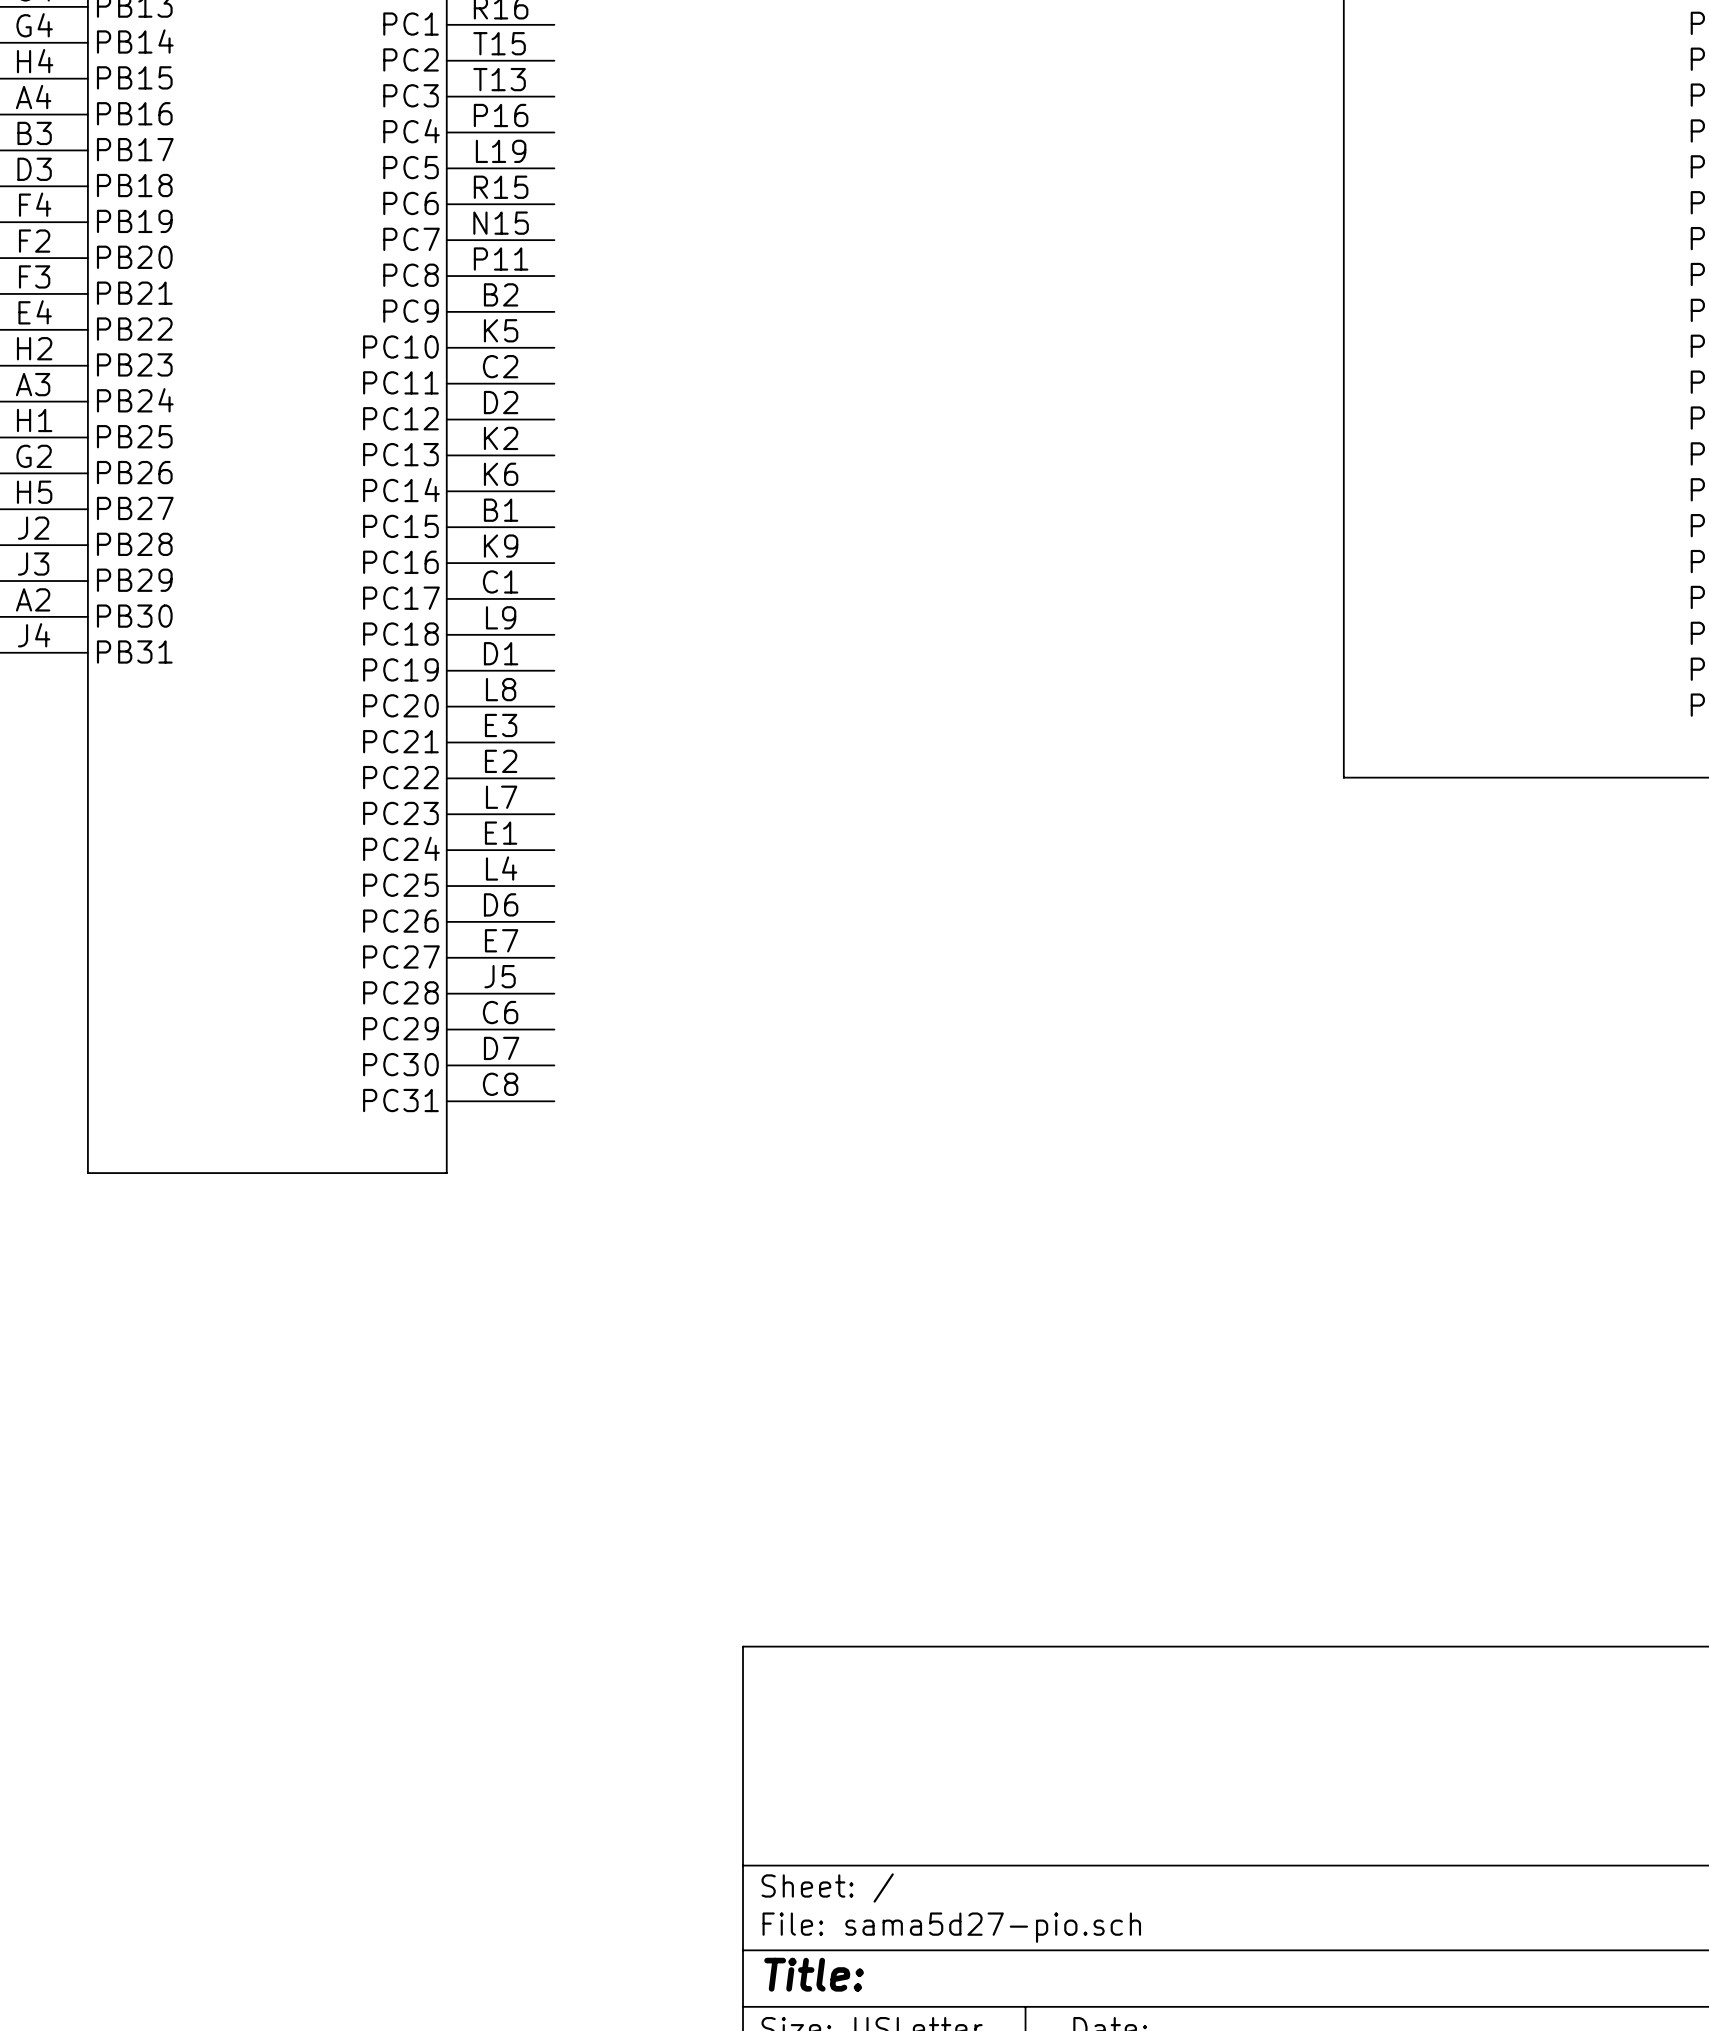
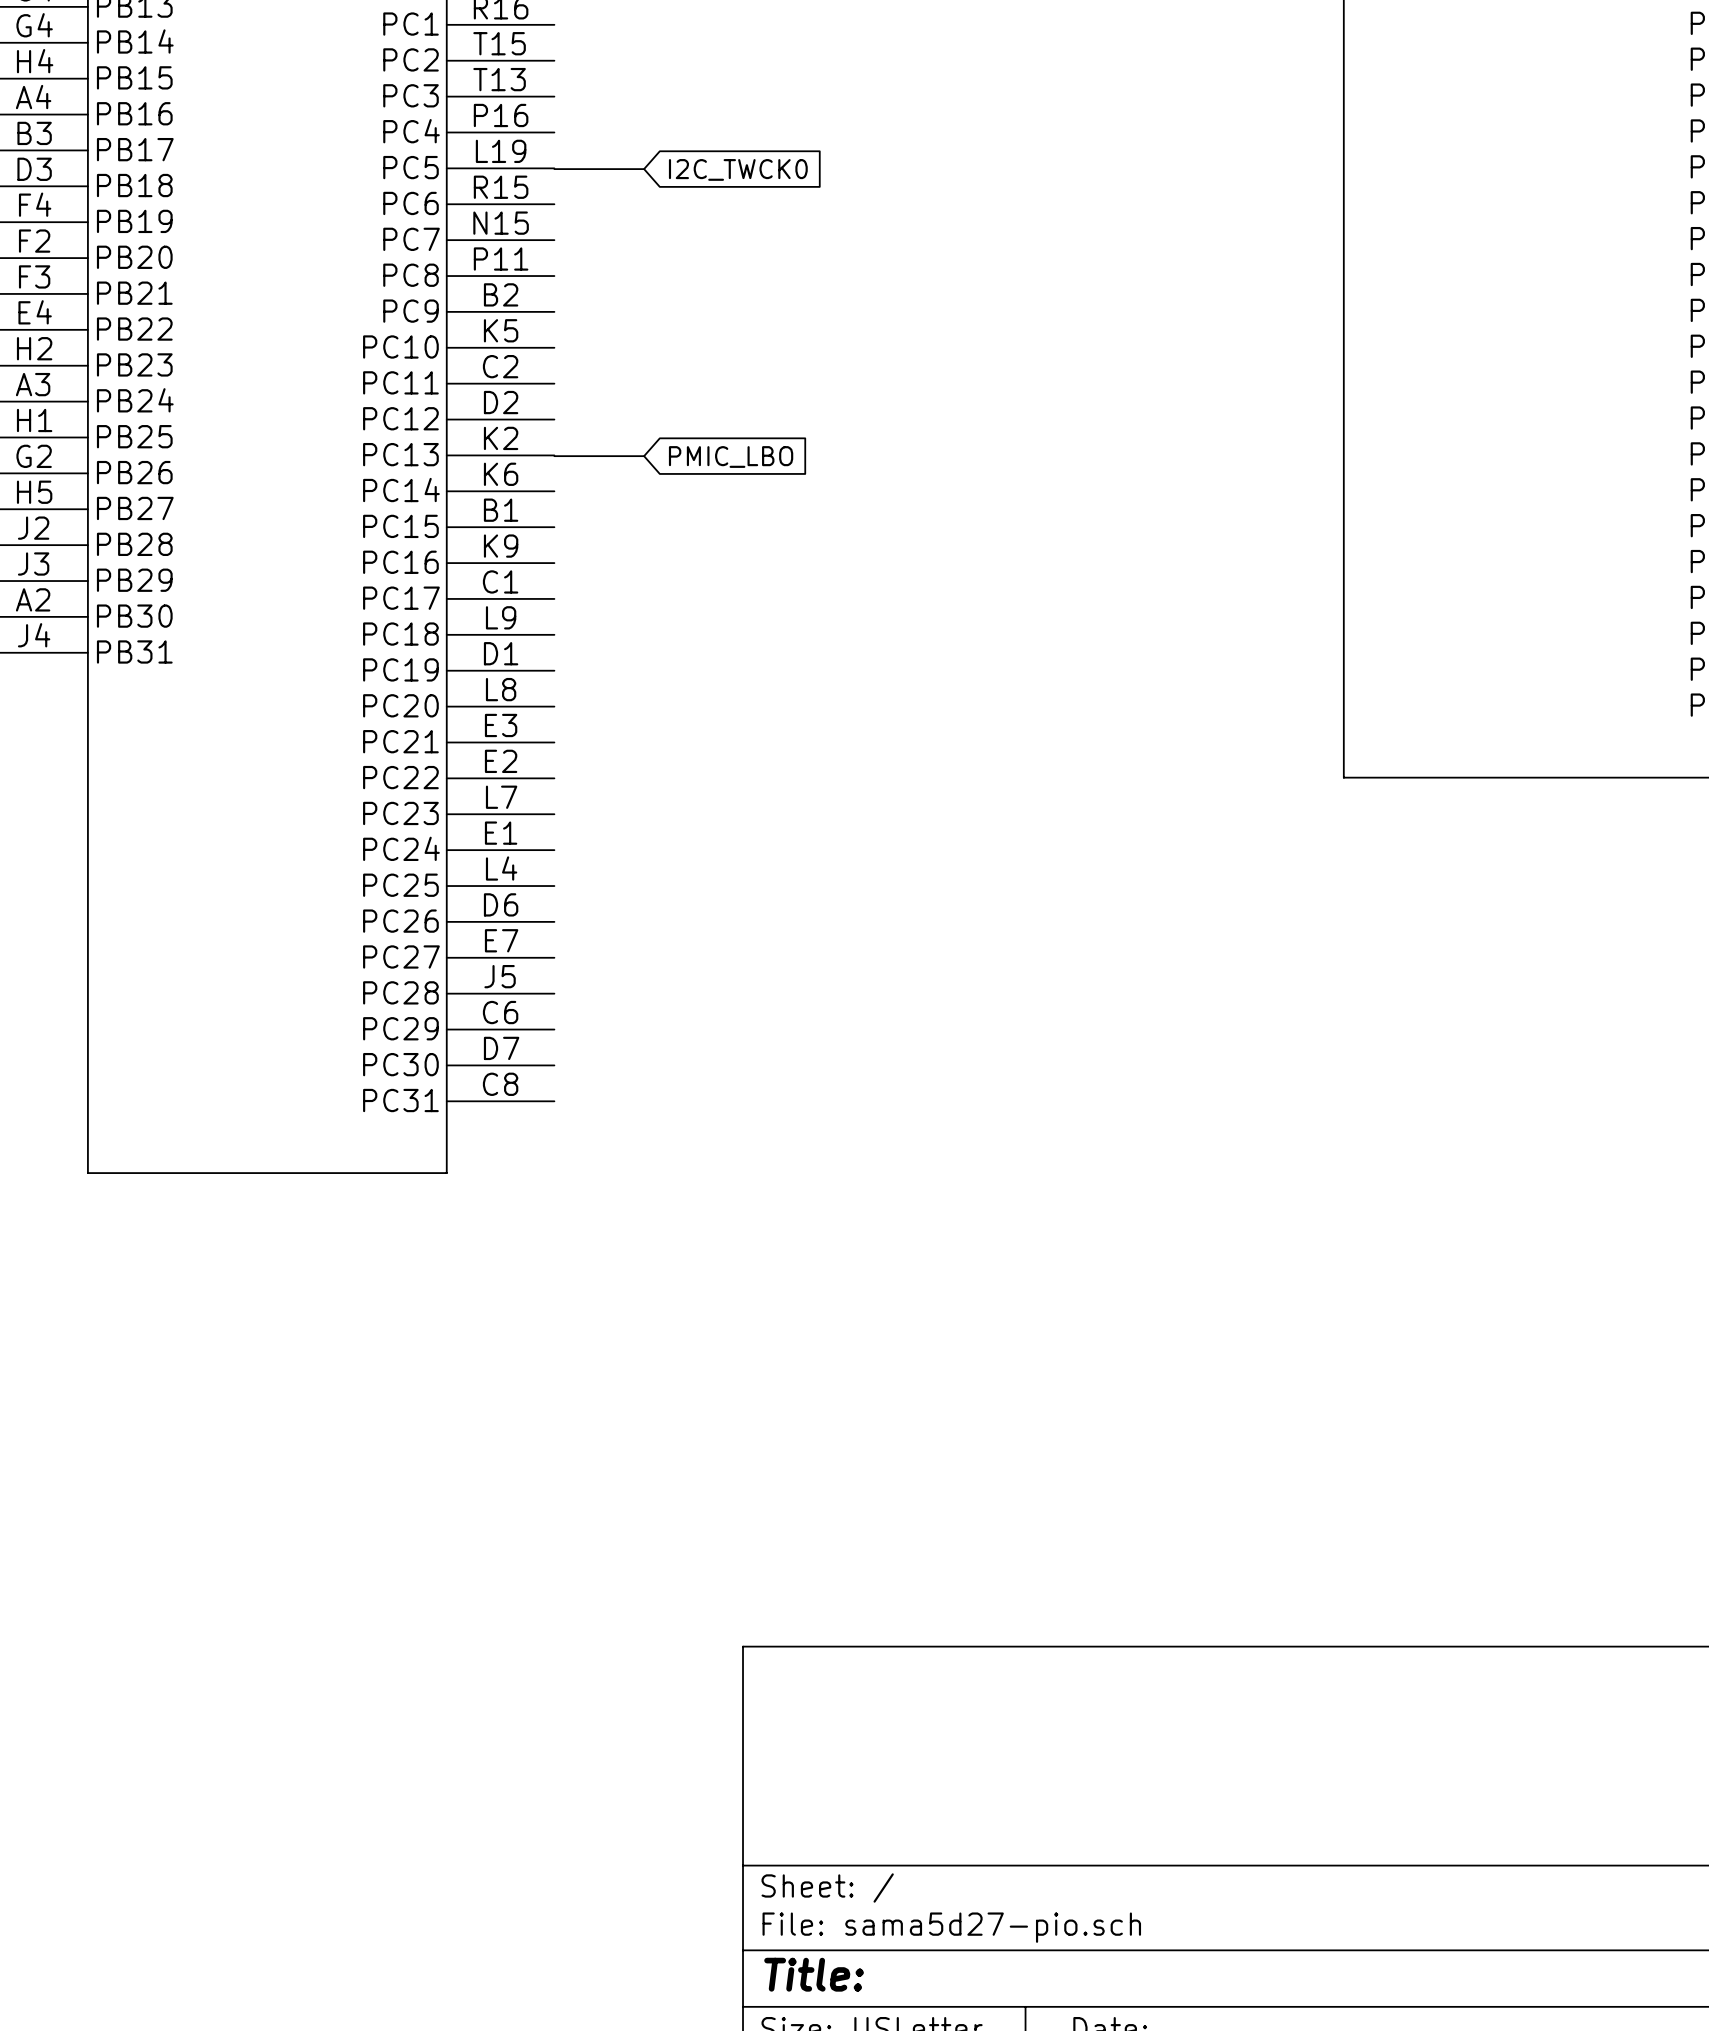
wire: none -> (554, 169) (644, 169)
global label: none -> I2C_TWCK0 (738, 169)
wire: none -> (554, 456) (644, 456)
global label: none -> PMIC_LBO (731, 457)

